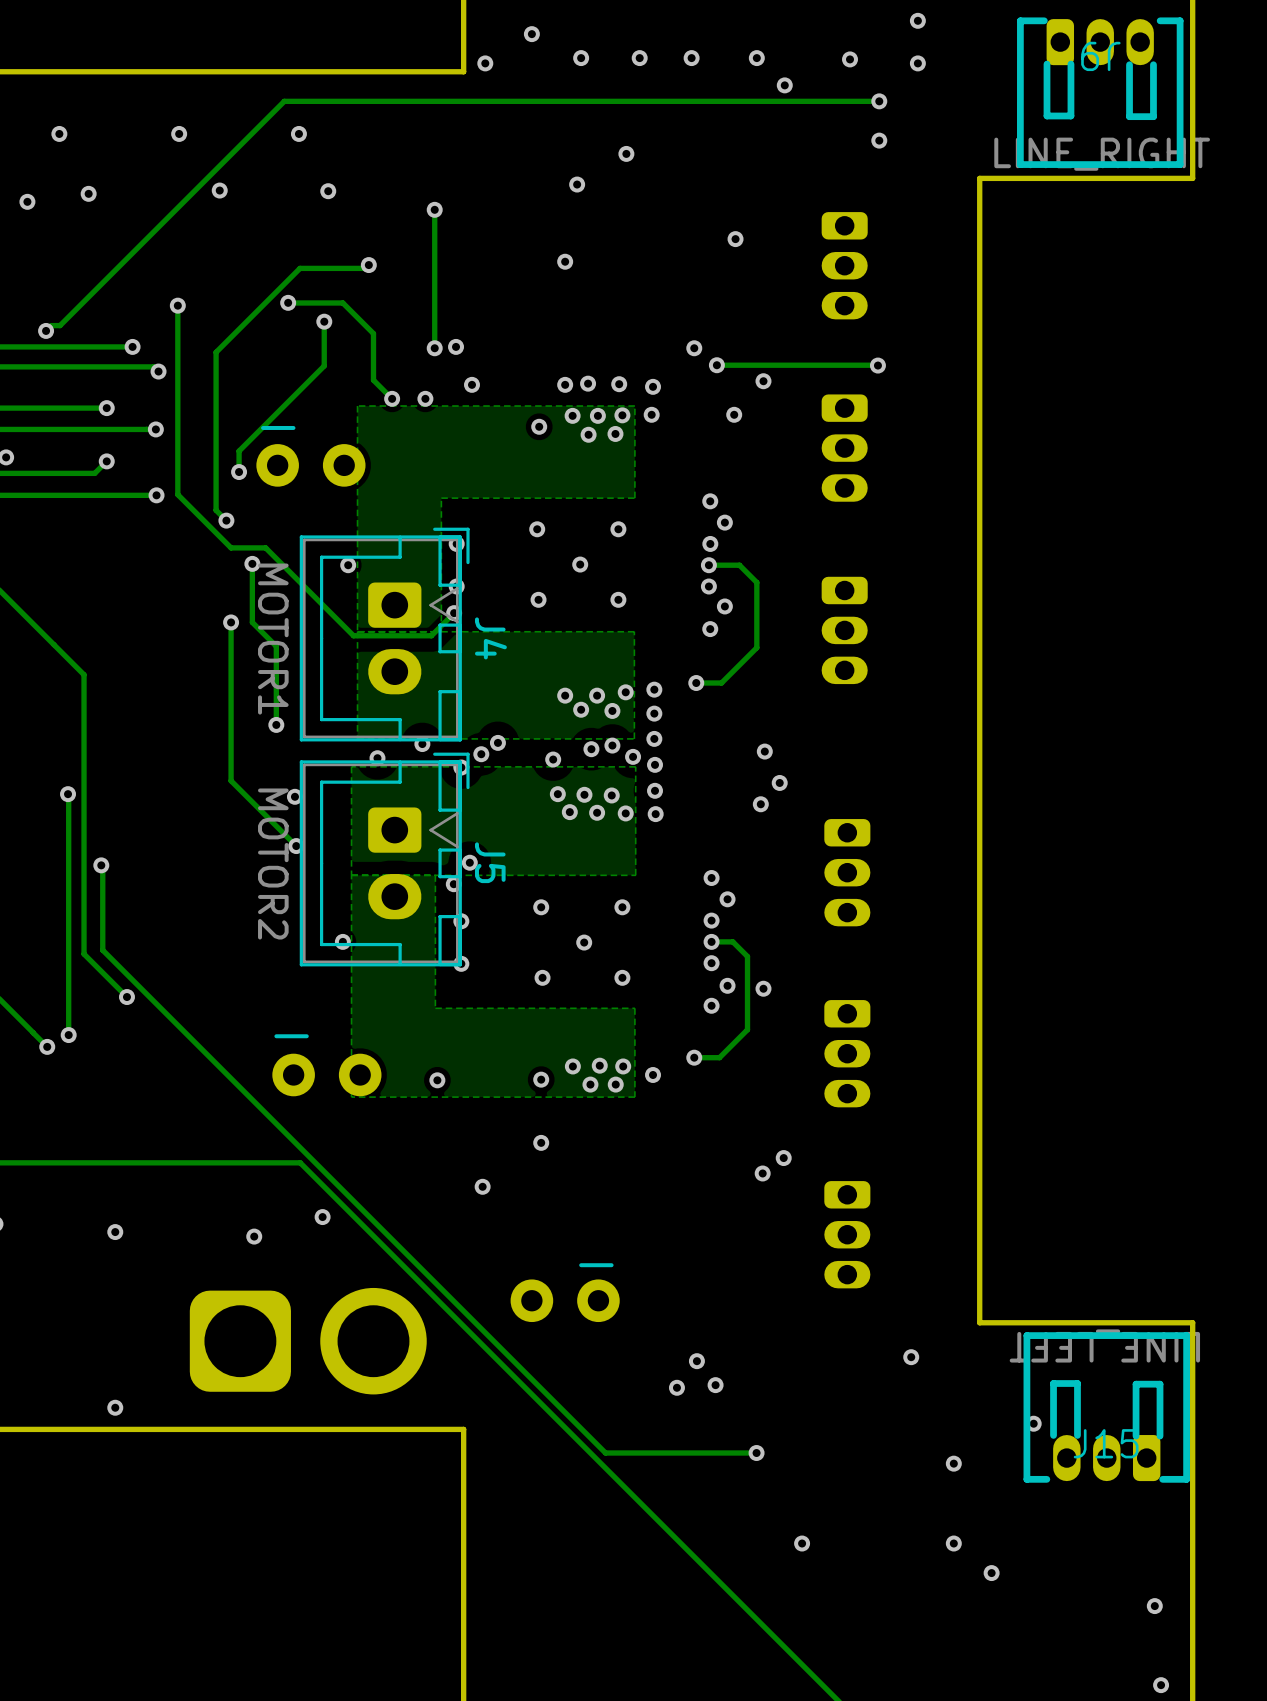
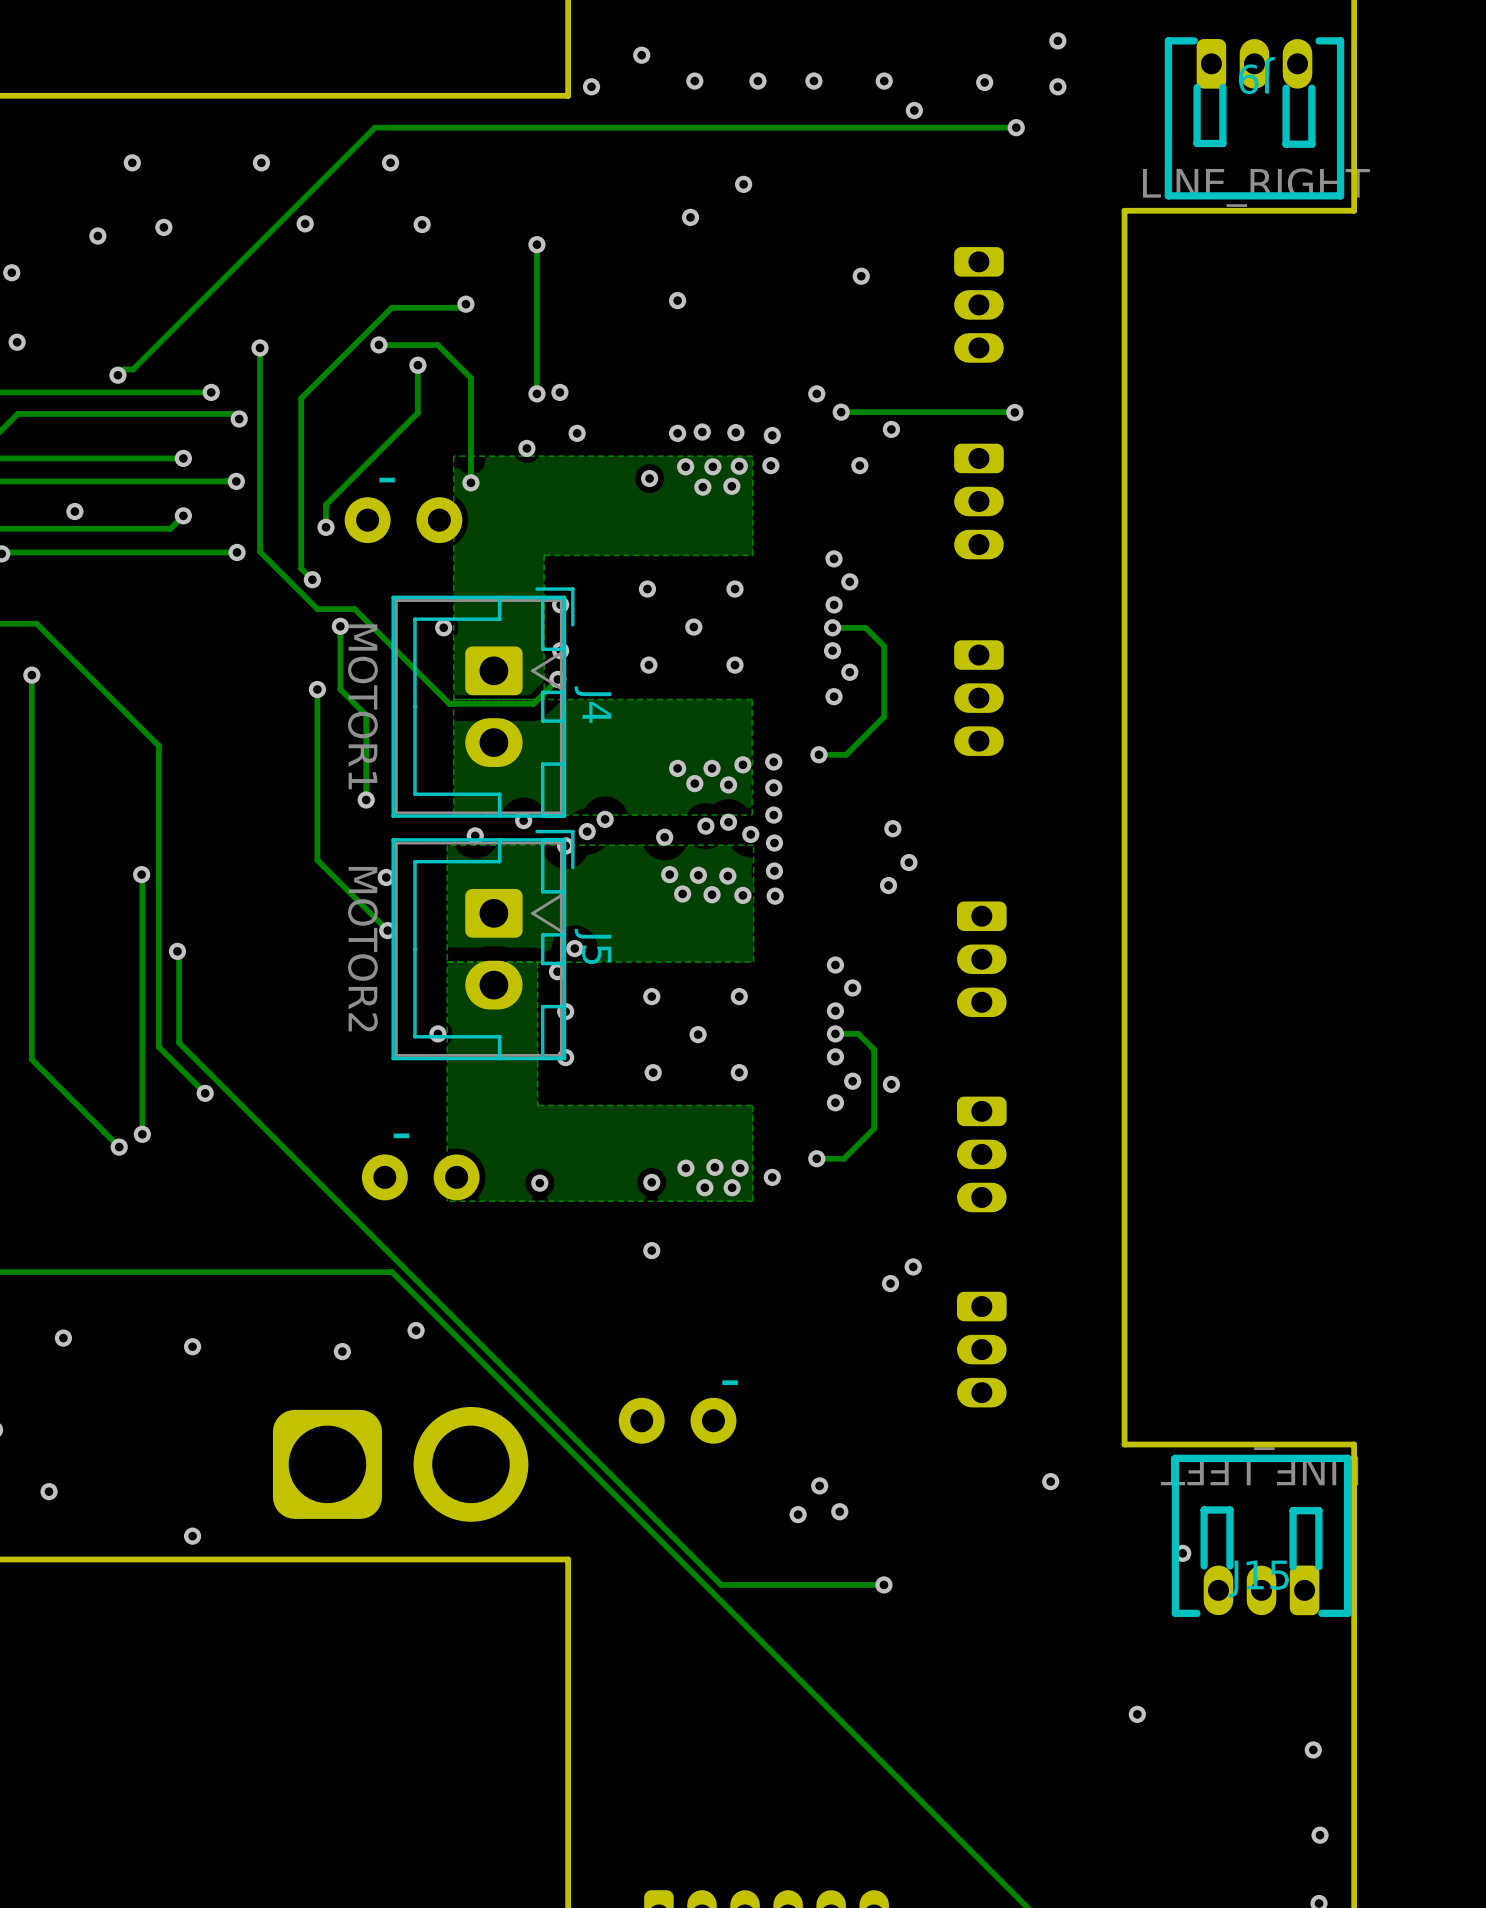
via: (879, 140) -> none
track: (373, 380) (392, 398) -> (470, 428) (470, 482)
via position: (392, 398) -> (470, 482)
via: (482, 1186) -> none
via: (953, 1463) -> none
via: (802, 1543) -> none
via: (953, 1543) -> none

